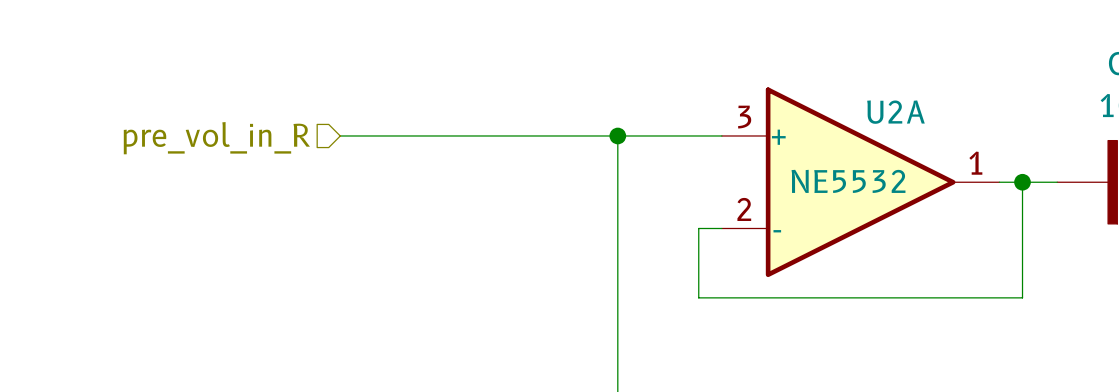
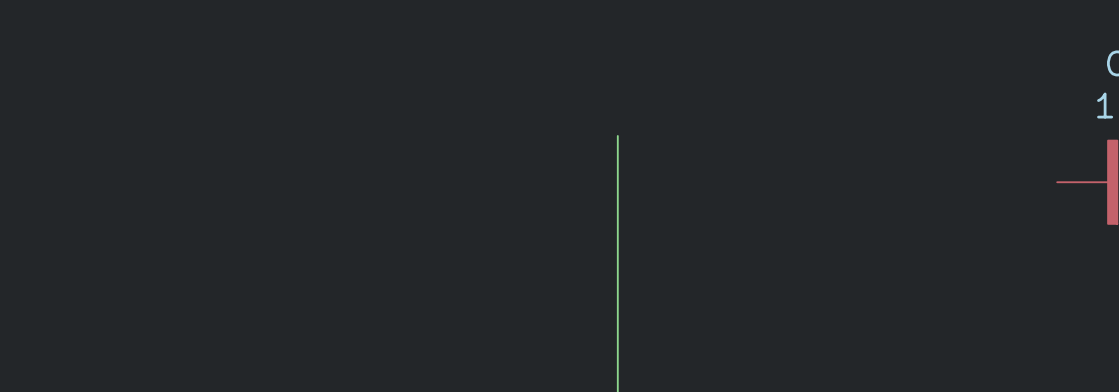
wire: (340, 135) (721, 135) -> none
junction: (617, 135) -> none
hierarchical label: pre_vol_in_R (216, 138) -> none
U2A: NE5532 (860, 182) -> none
wire: (999, 182) (1057, 182) -> none
wire: (1022, 182) (1022, 297) (698, 297) (698, 228) (721, 228) -> none
junction: (1022, 182) -> none

